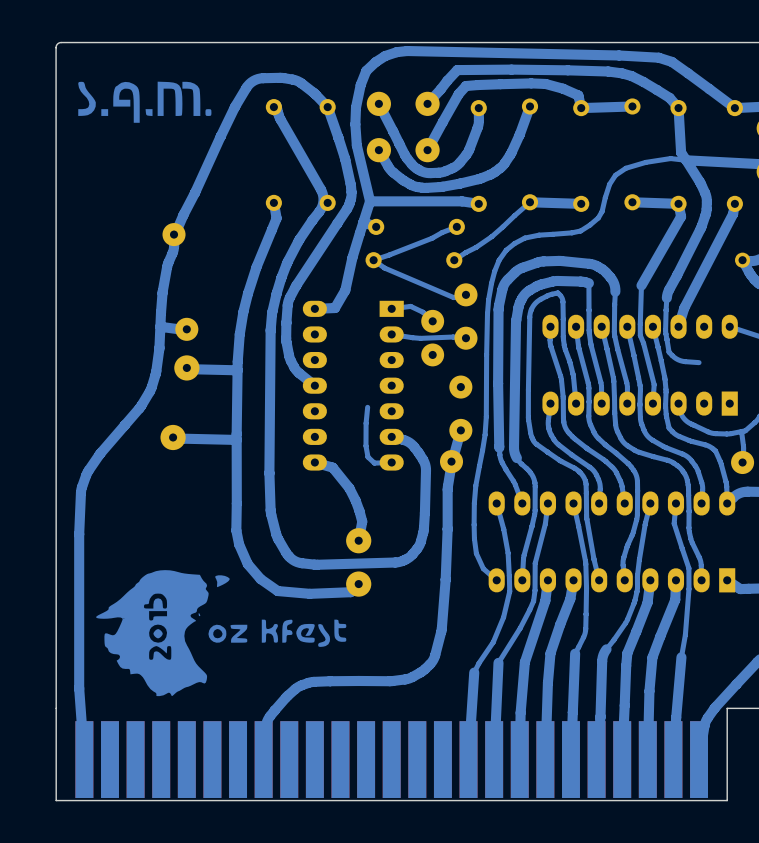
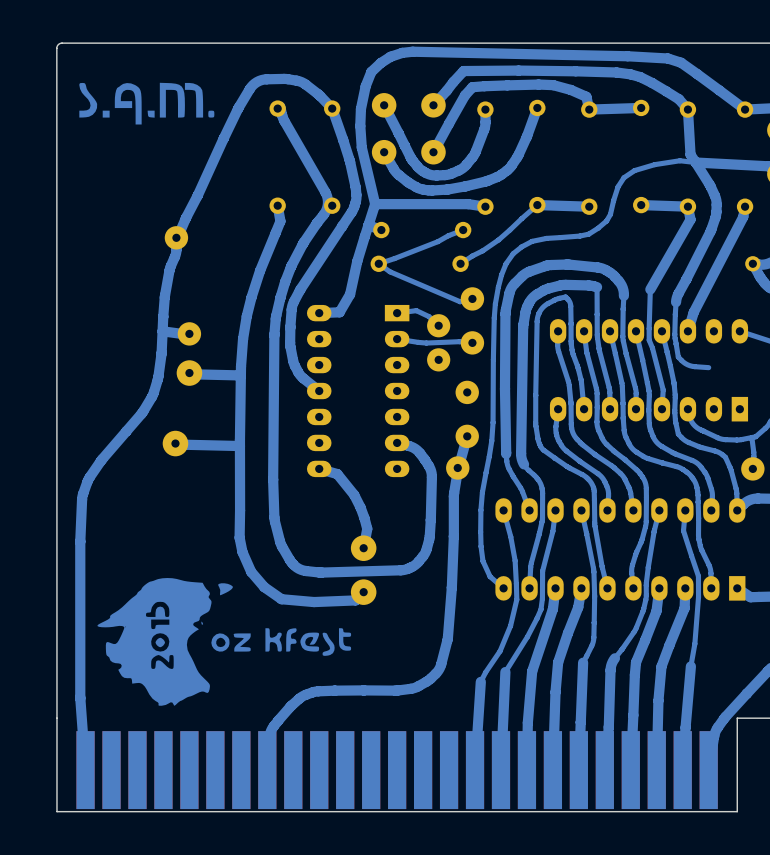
bottom track: (367, 407) (365, 445) (367, 457) (374, 463) (391, 462) -> none

